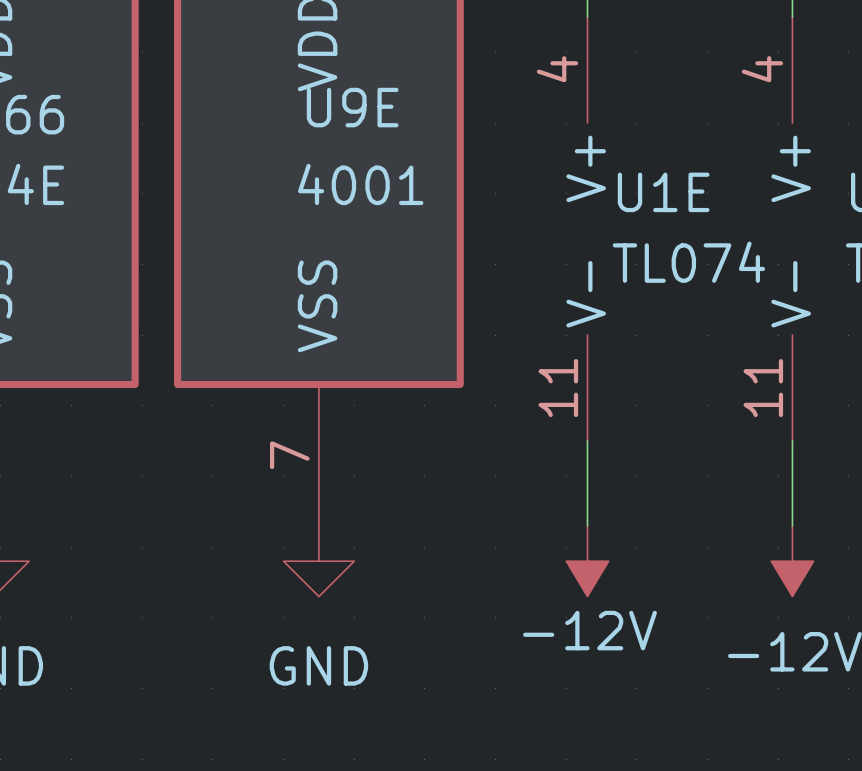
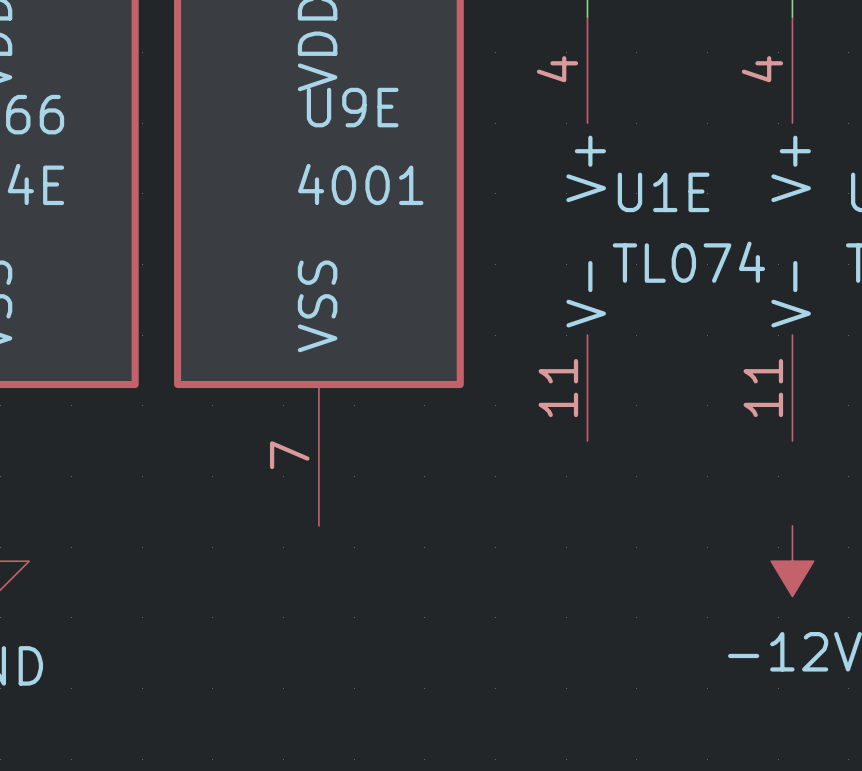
wire: (587, 441) (587, 525) -> none
wire: (792, 441) (792, 525) -> none
power symbol: GND (318, 561) -> none
power symbol: -12V (587, 561) -> none

